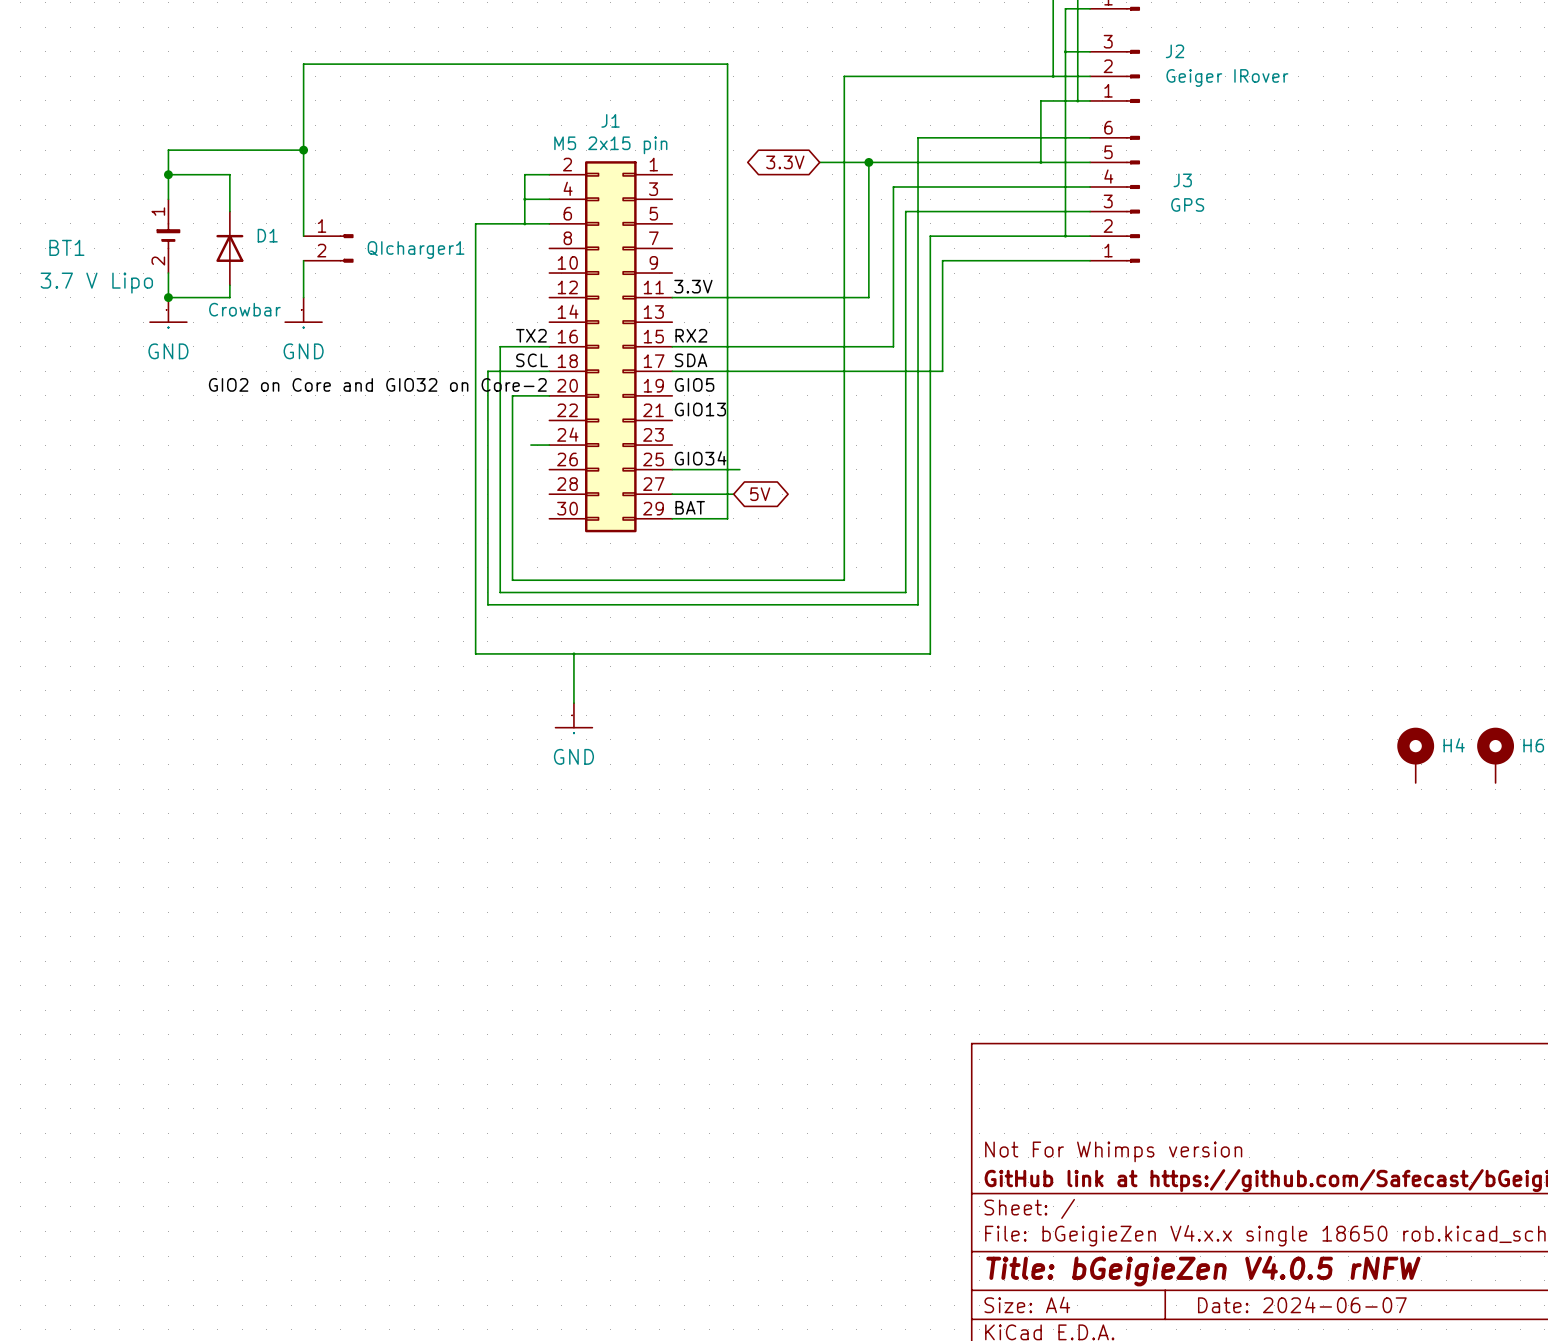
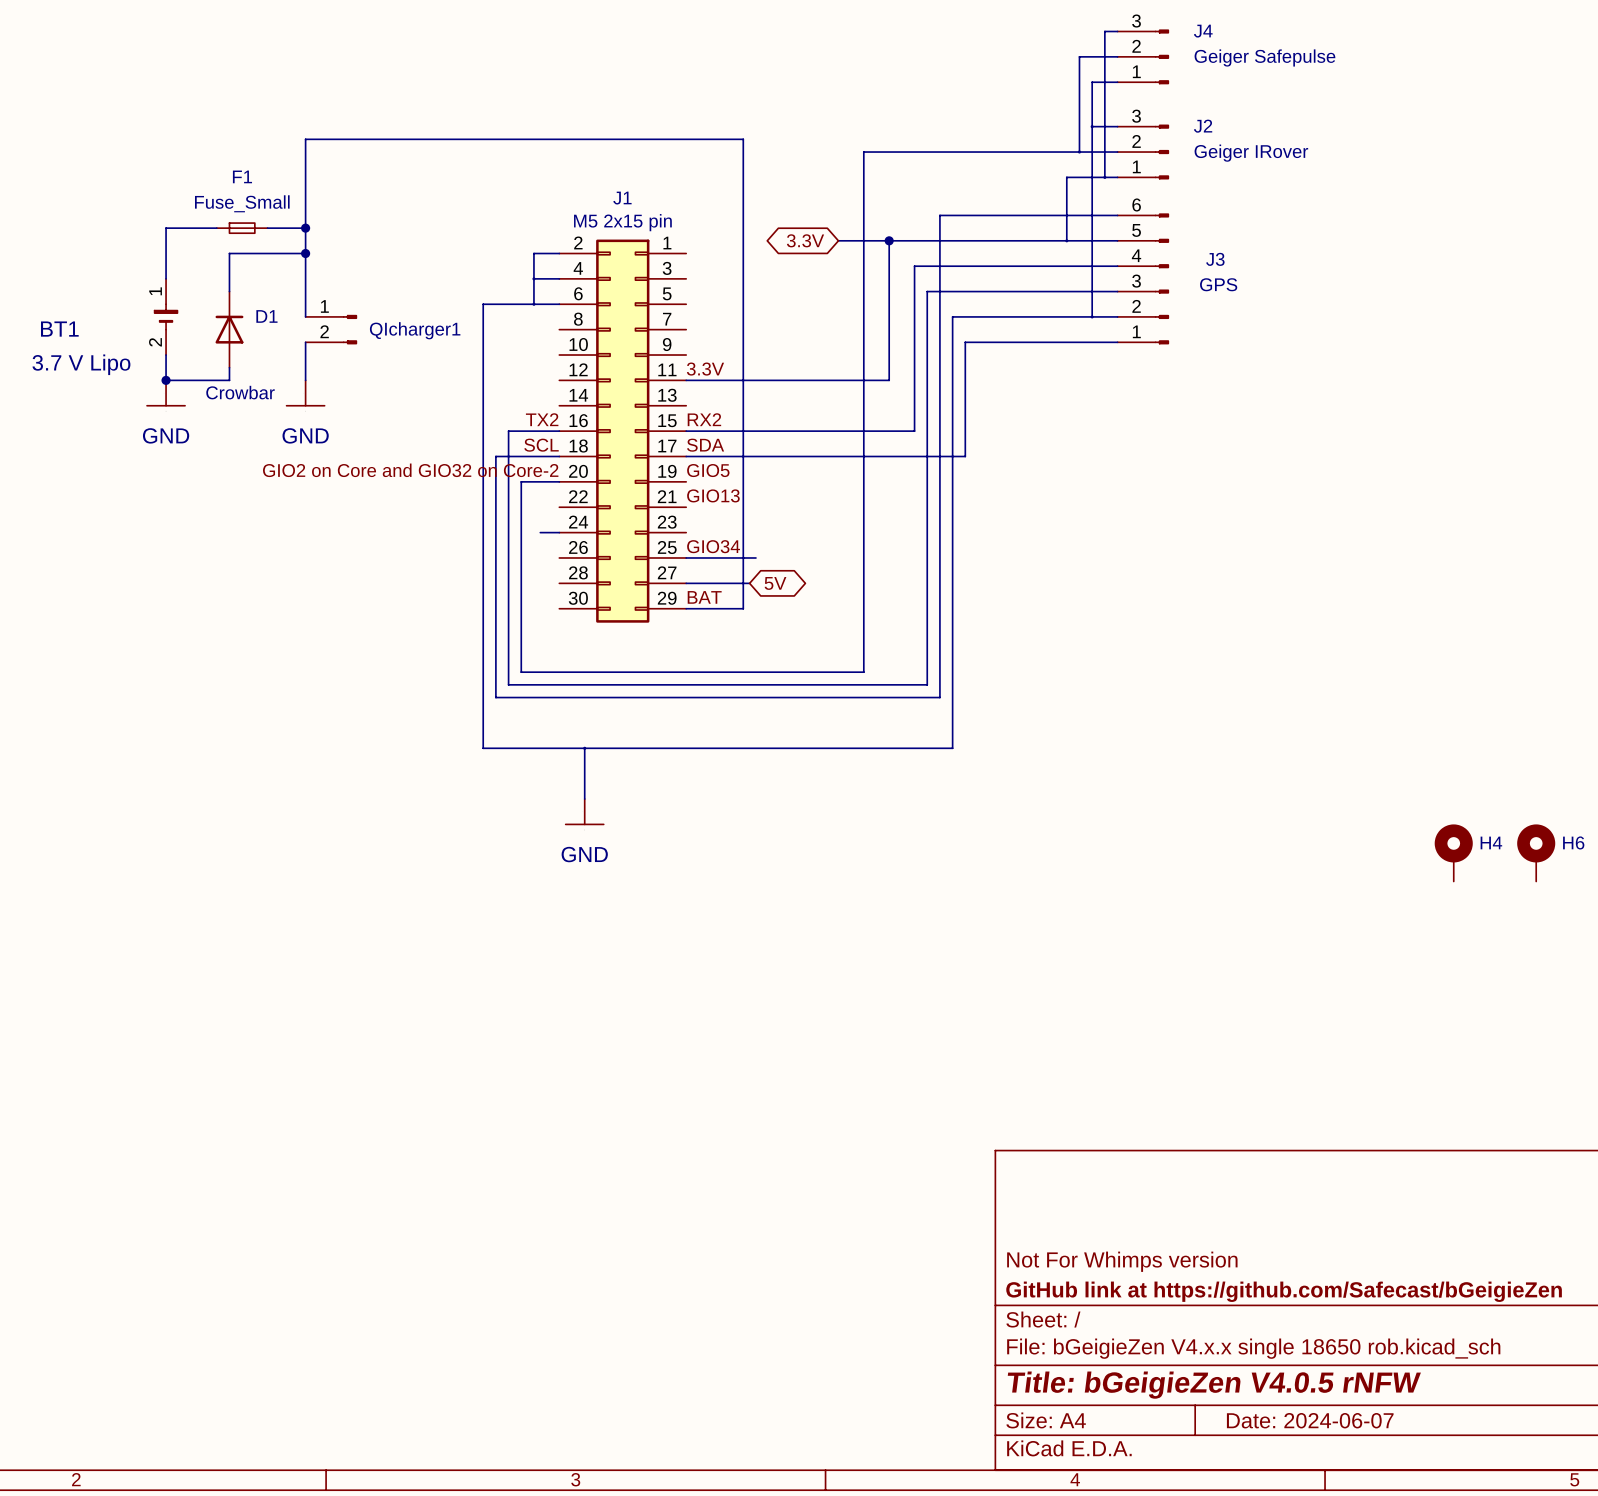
F1: none -> Fuse_Small (242, 228)
wire: (168, 174) (229, 174) -> (305, 253) (229, 253)
junction: (168, 174) -> none
junction: none -> (305, 253)

